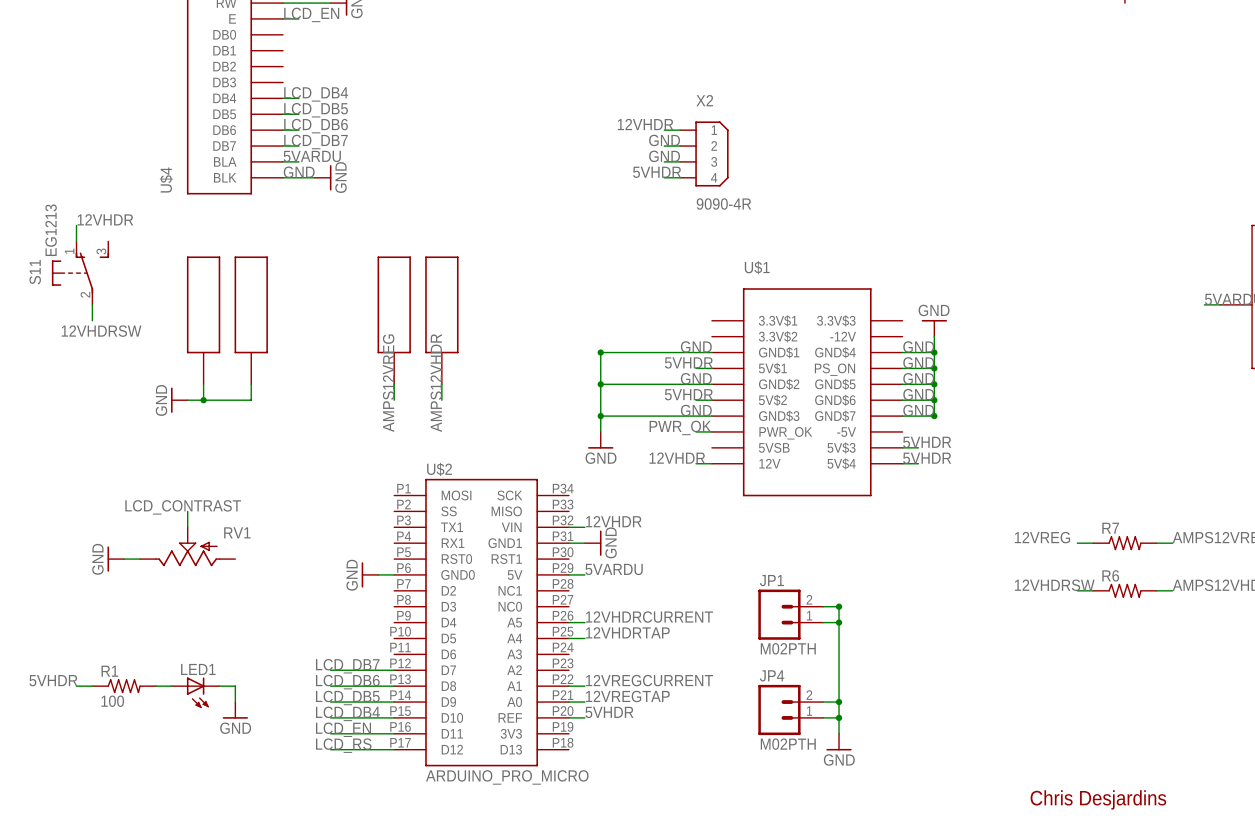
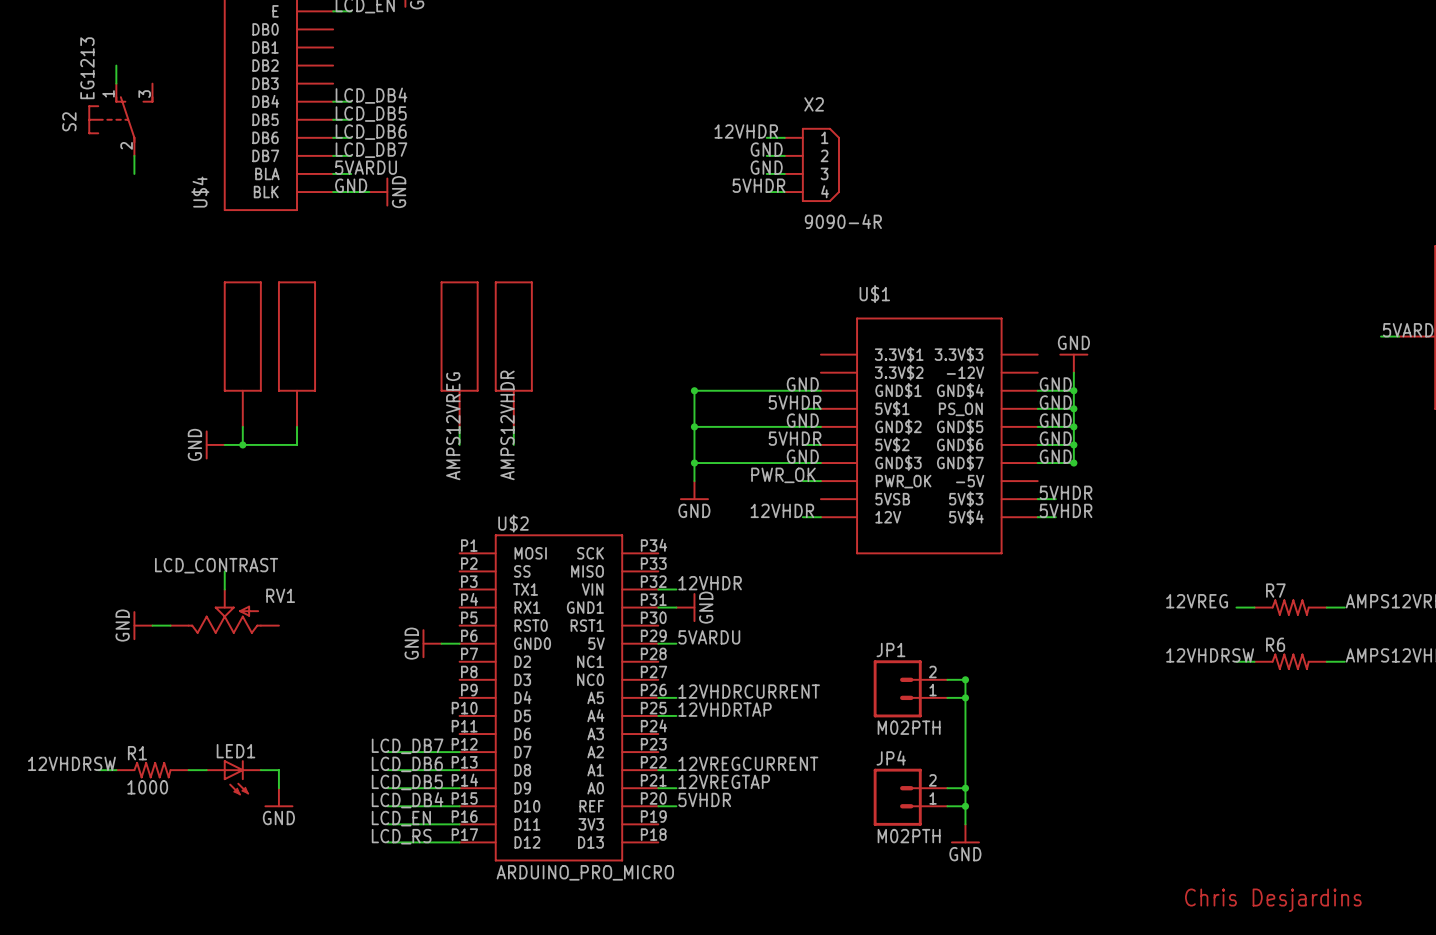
wire: none -> (116, 65) (116, 83)
S2: none -> EG1213 (120, 119)
label: 12VHDR (105, 219) -> none
wire: (76, 225) (76, 241) -> (134, 155) (134, 173)
S11: EG1213 (80, 273) -> none
wire: (92, 304) (92, 320) -> none
label: 12VHDRSW (101, 331) -> none
label: 5VHDR (53, 680) -> 12VHDRSW (71, 763)
R1 value: 100 (112, 701) -> 1000 (147, 787)

